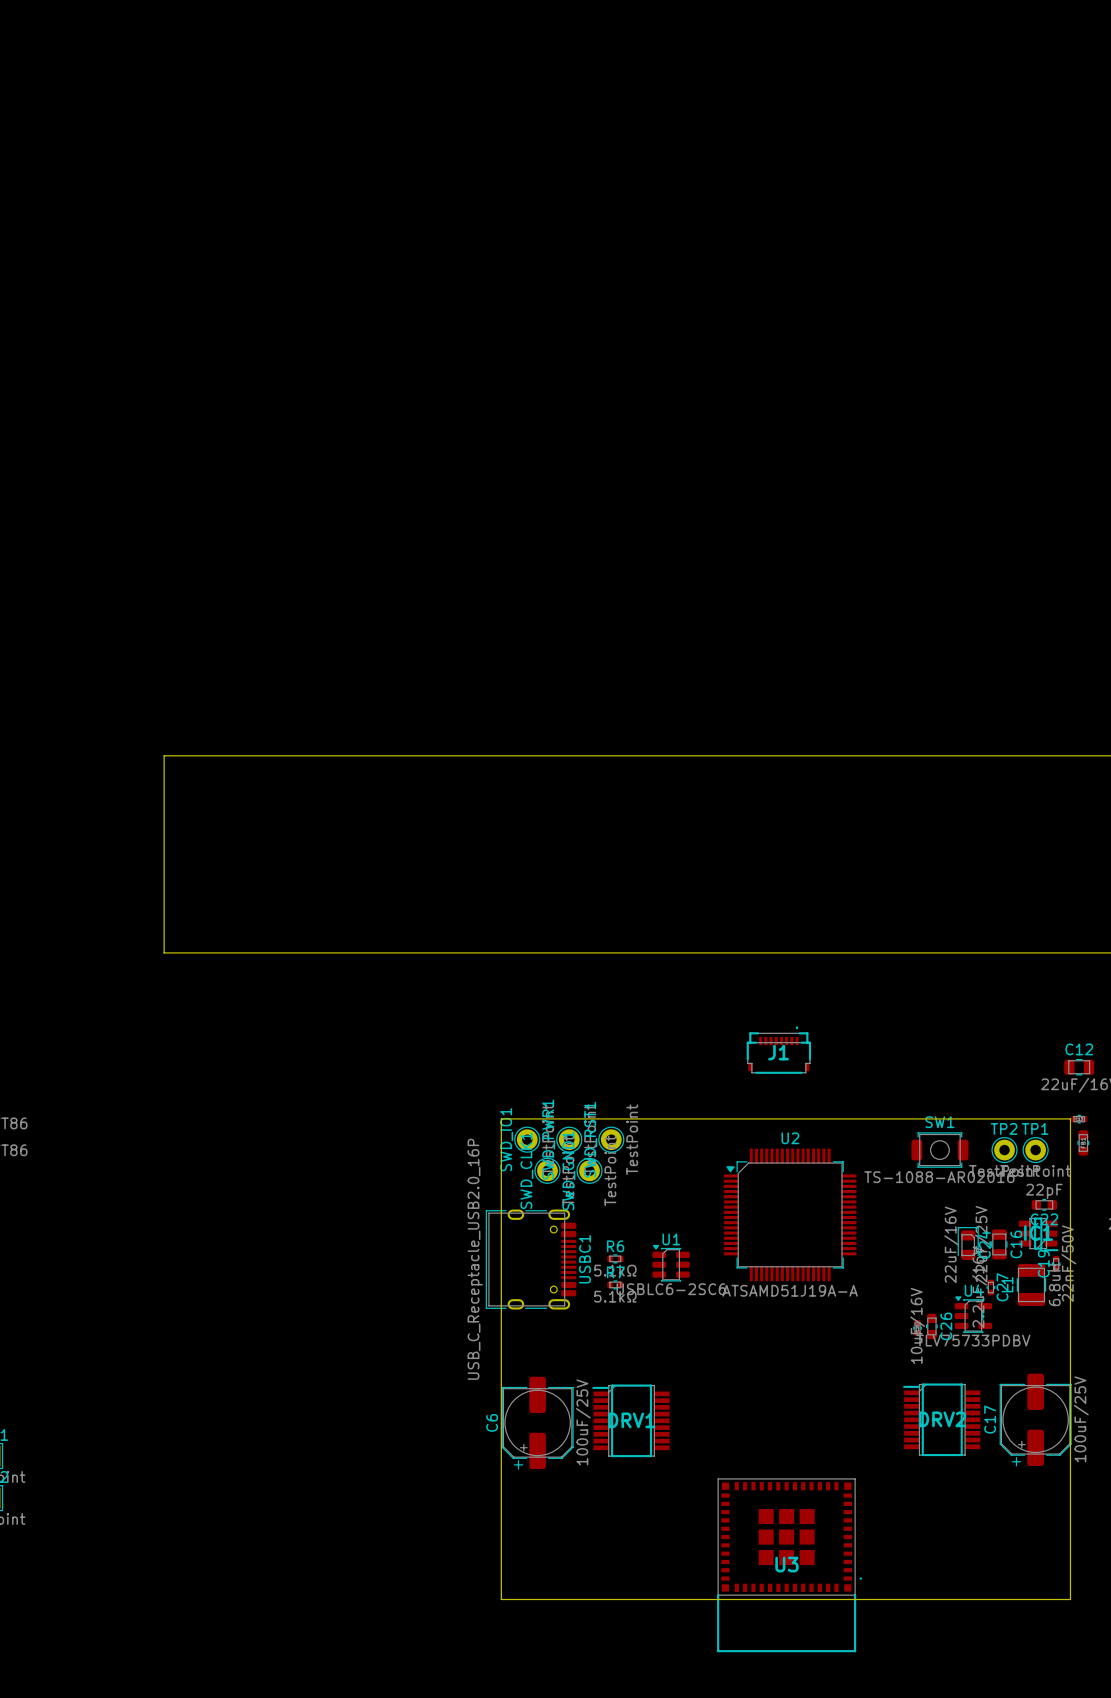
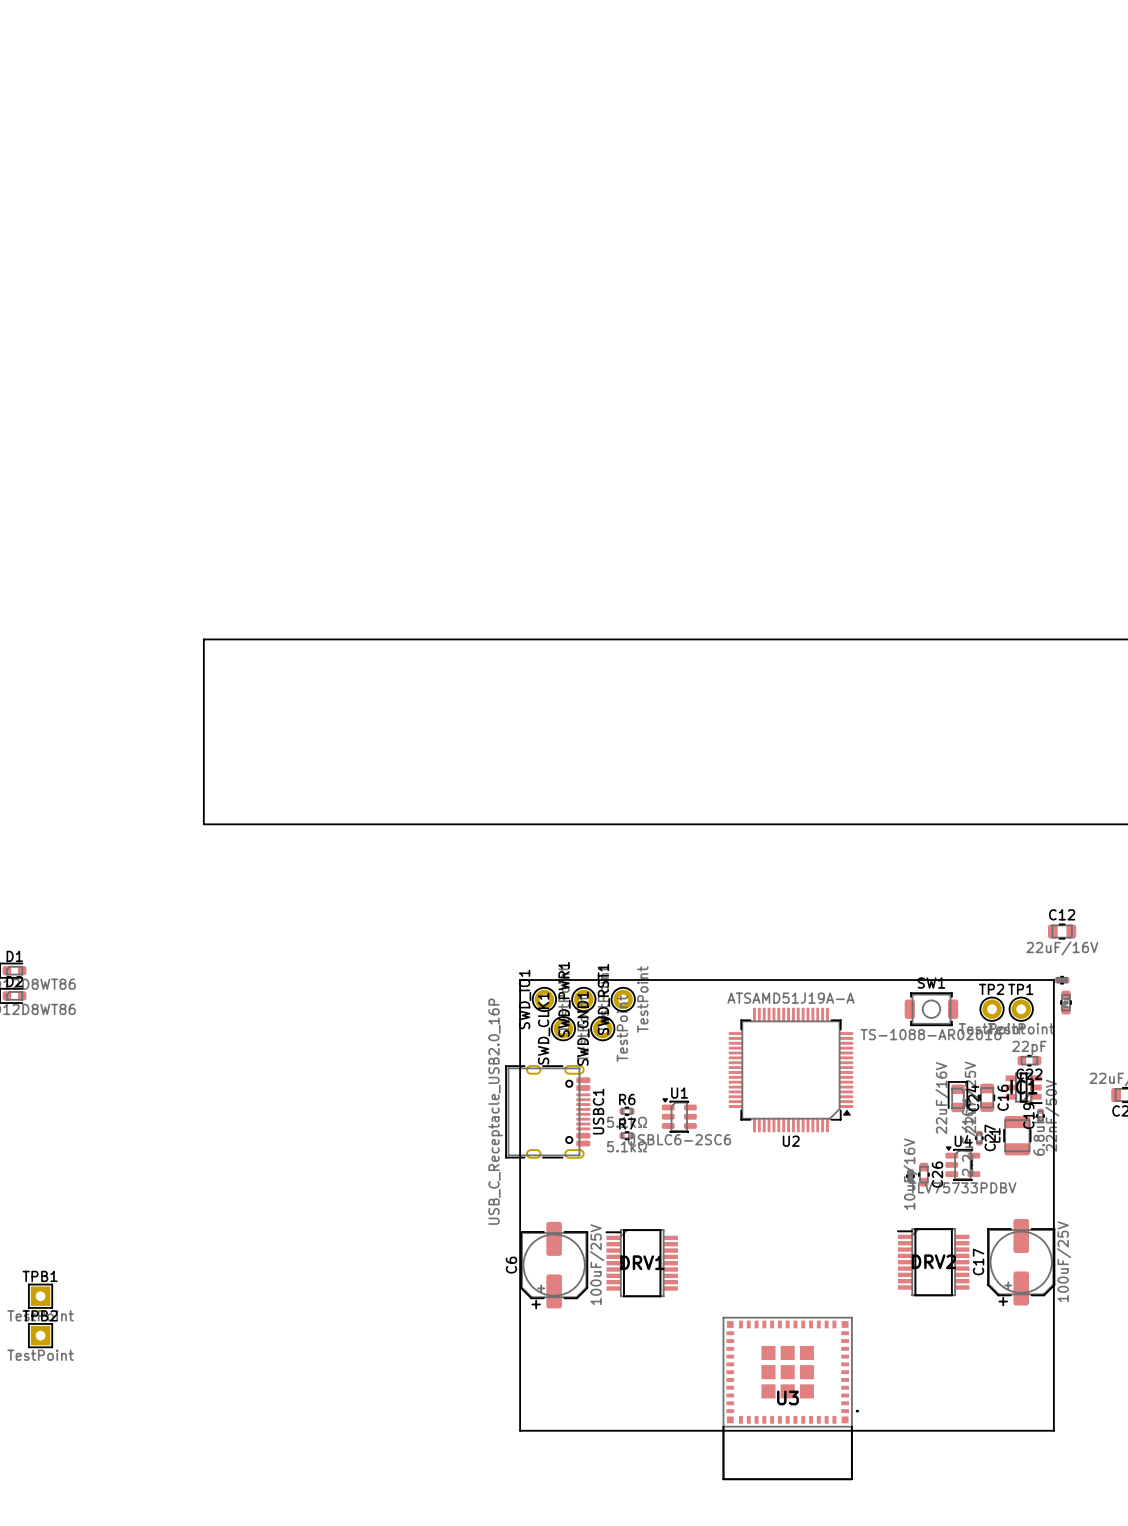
J1: (778, 1050) -> none
U2 rotation: 0° (790, 1214) -> 180° (790, 1070)

